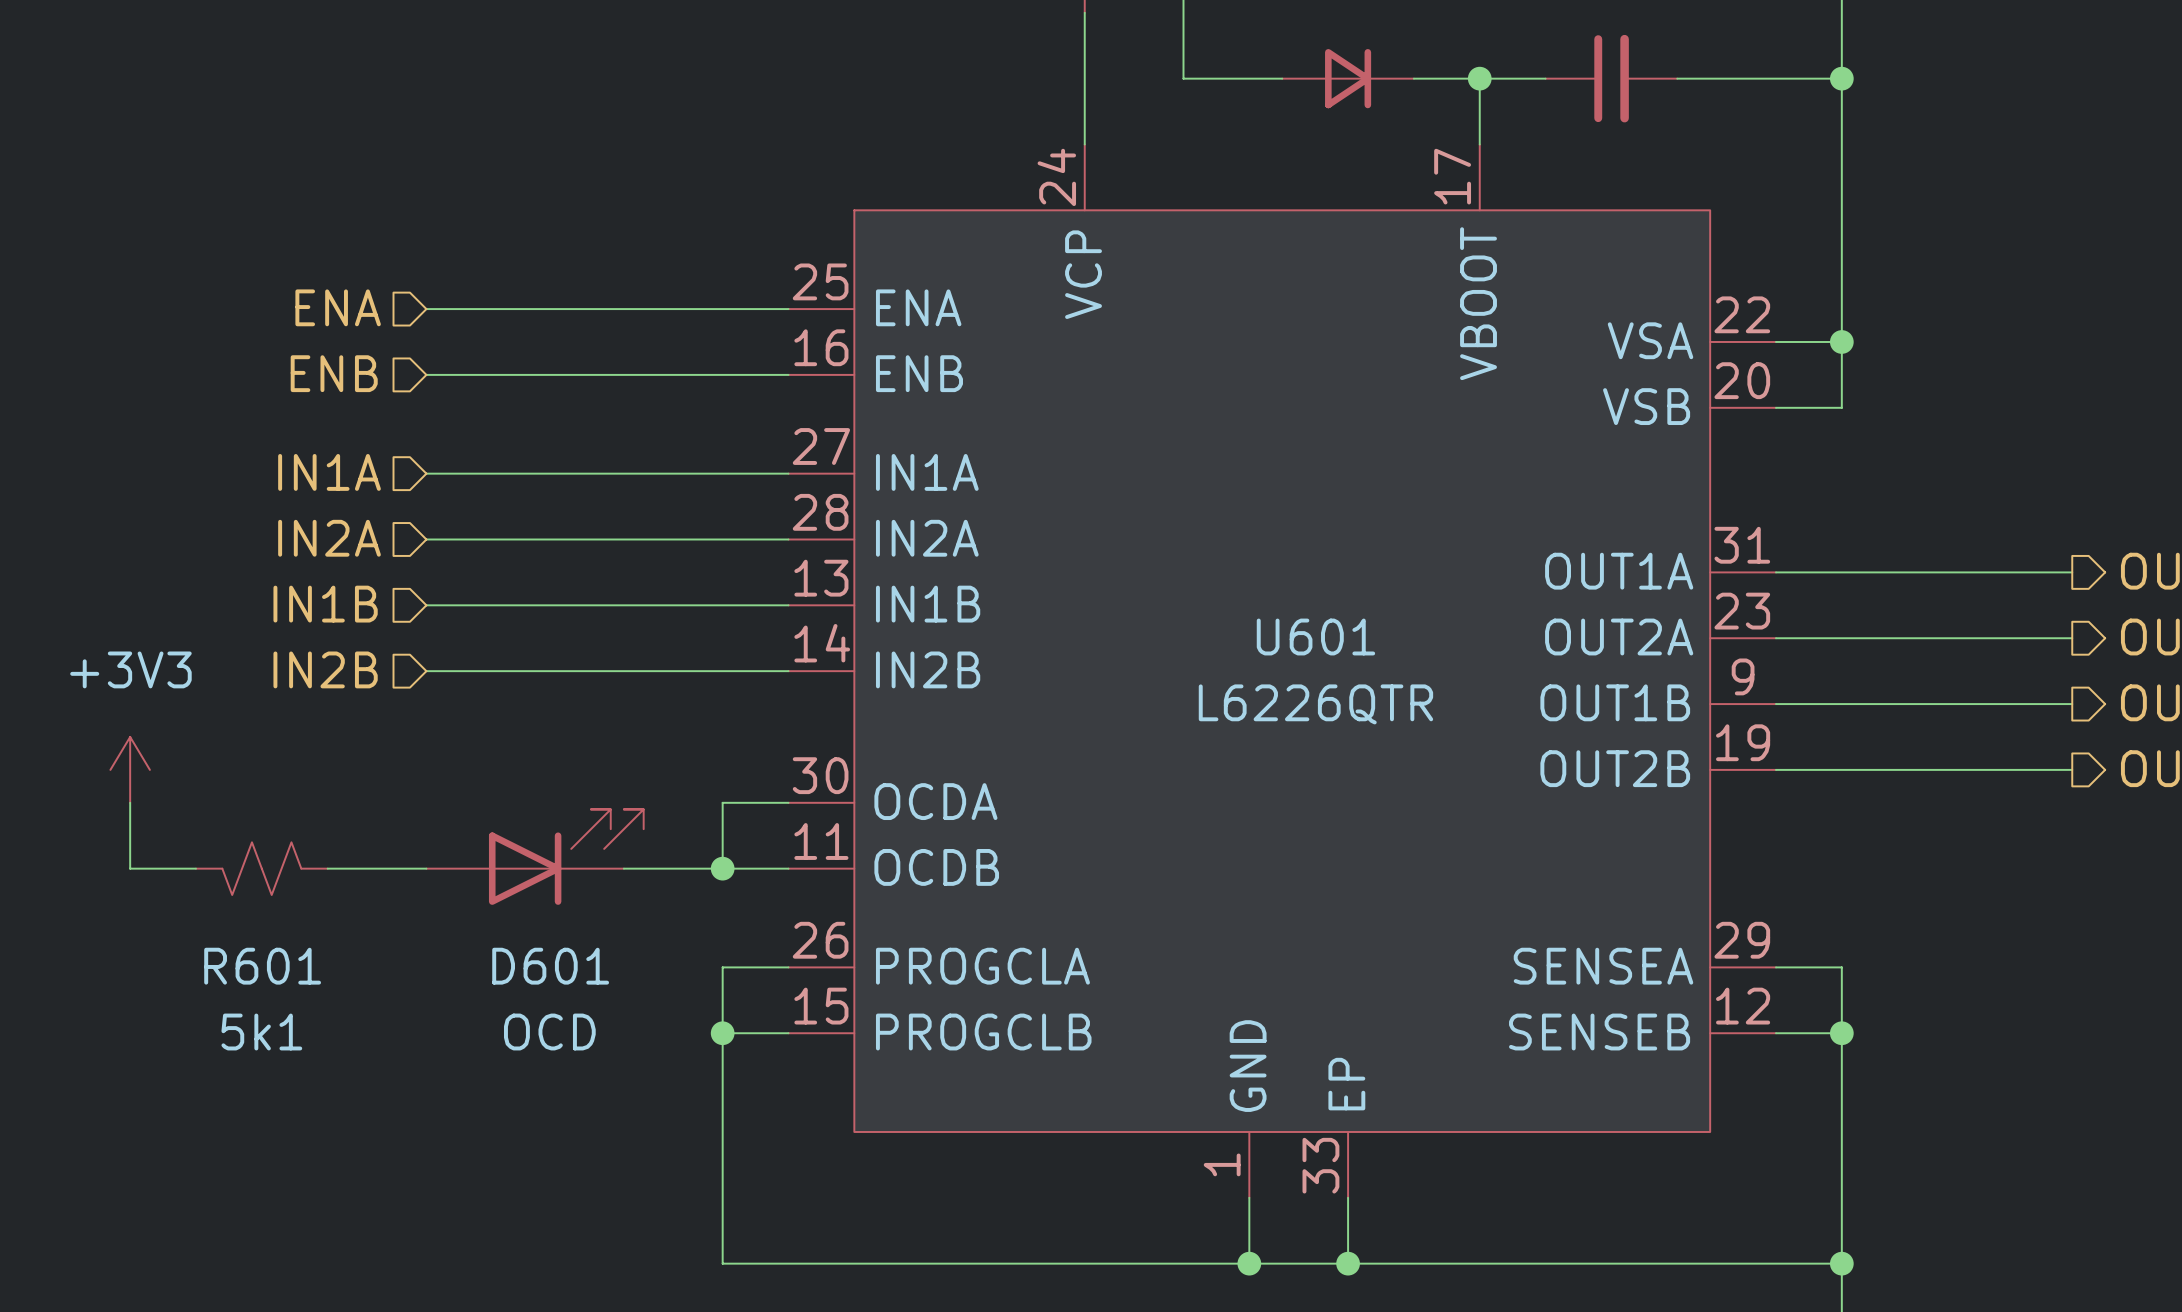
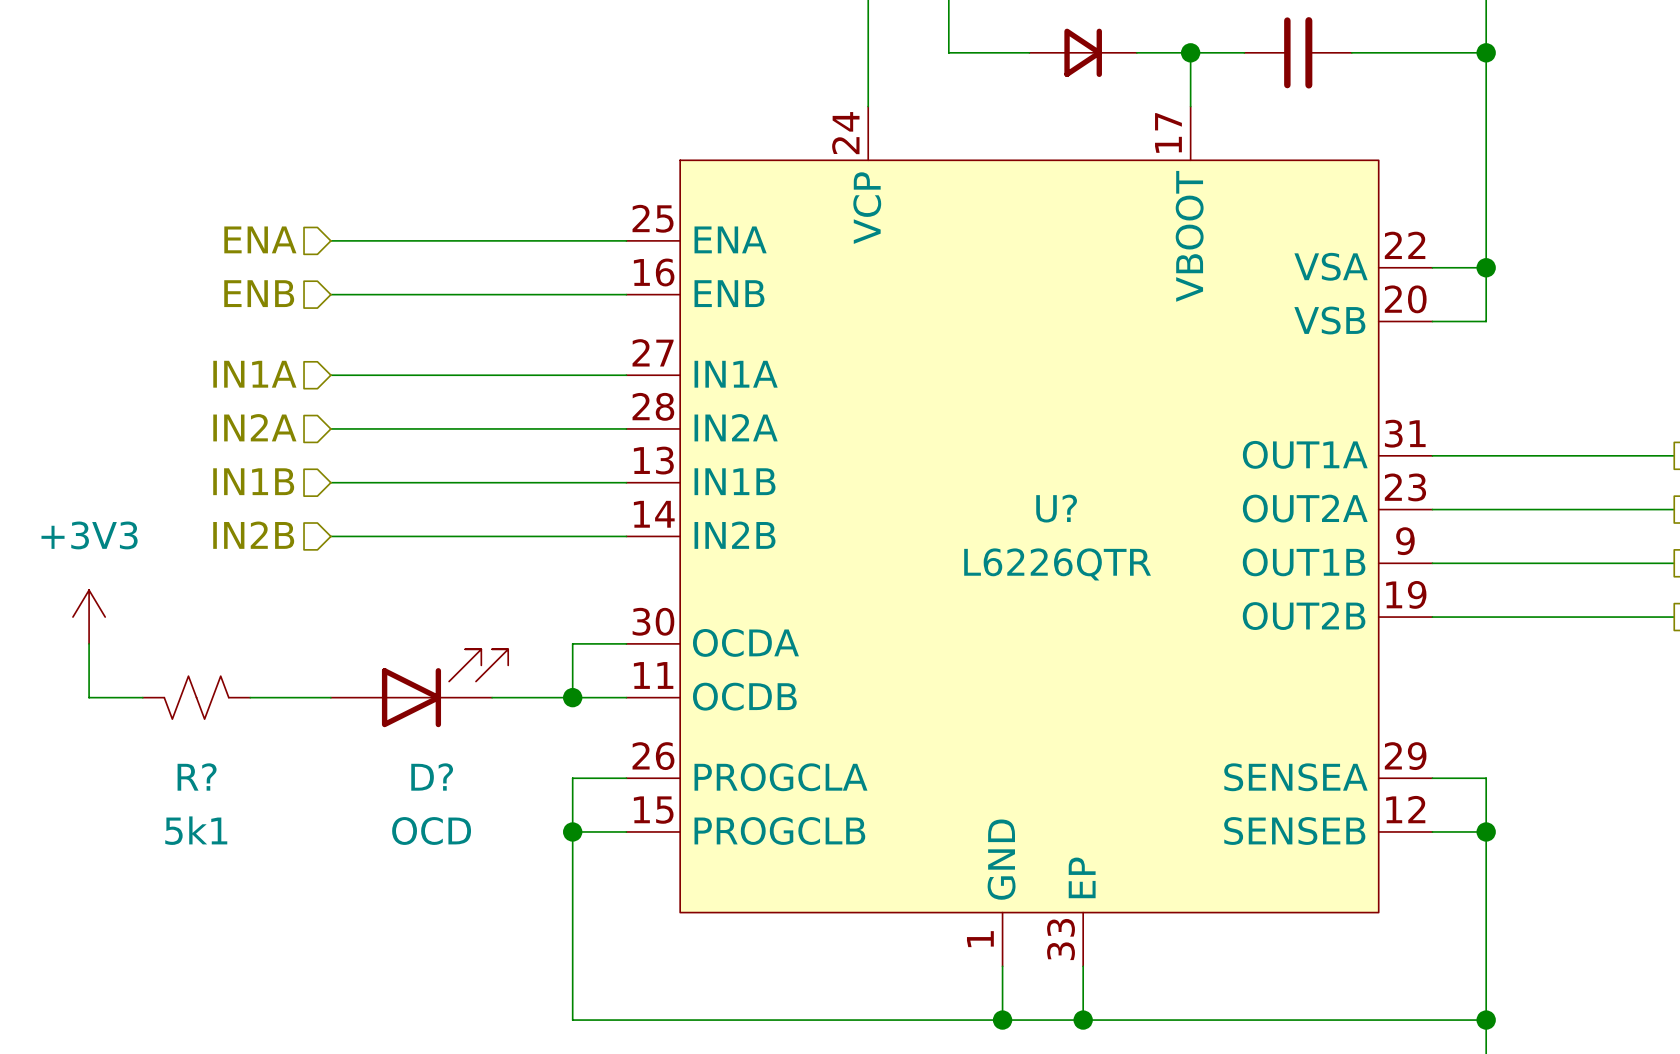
U601 name: U601 (1315, 637) -> U? (1056, 508)
R601 name: R601 (262, 966) -> R? (197, 777)
D601 name: D601 (550, 966) -> D? (432, 777)

